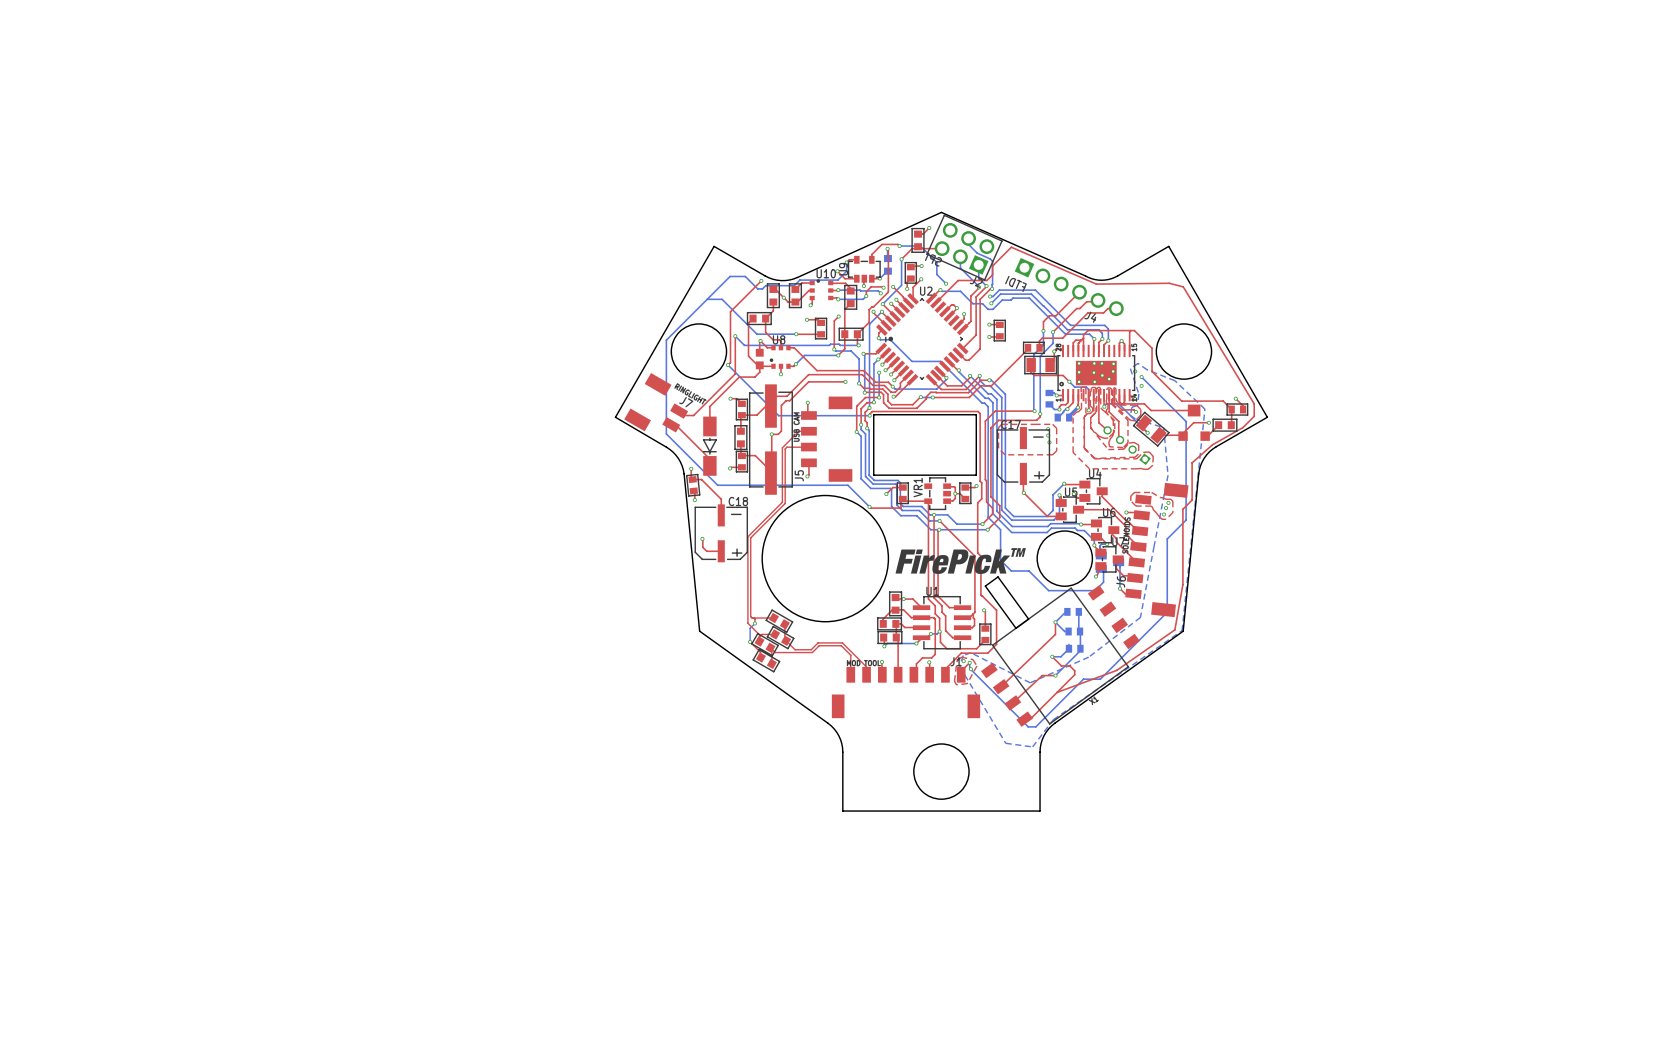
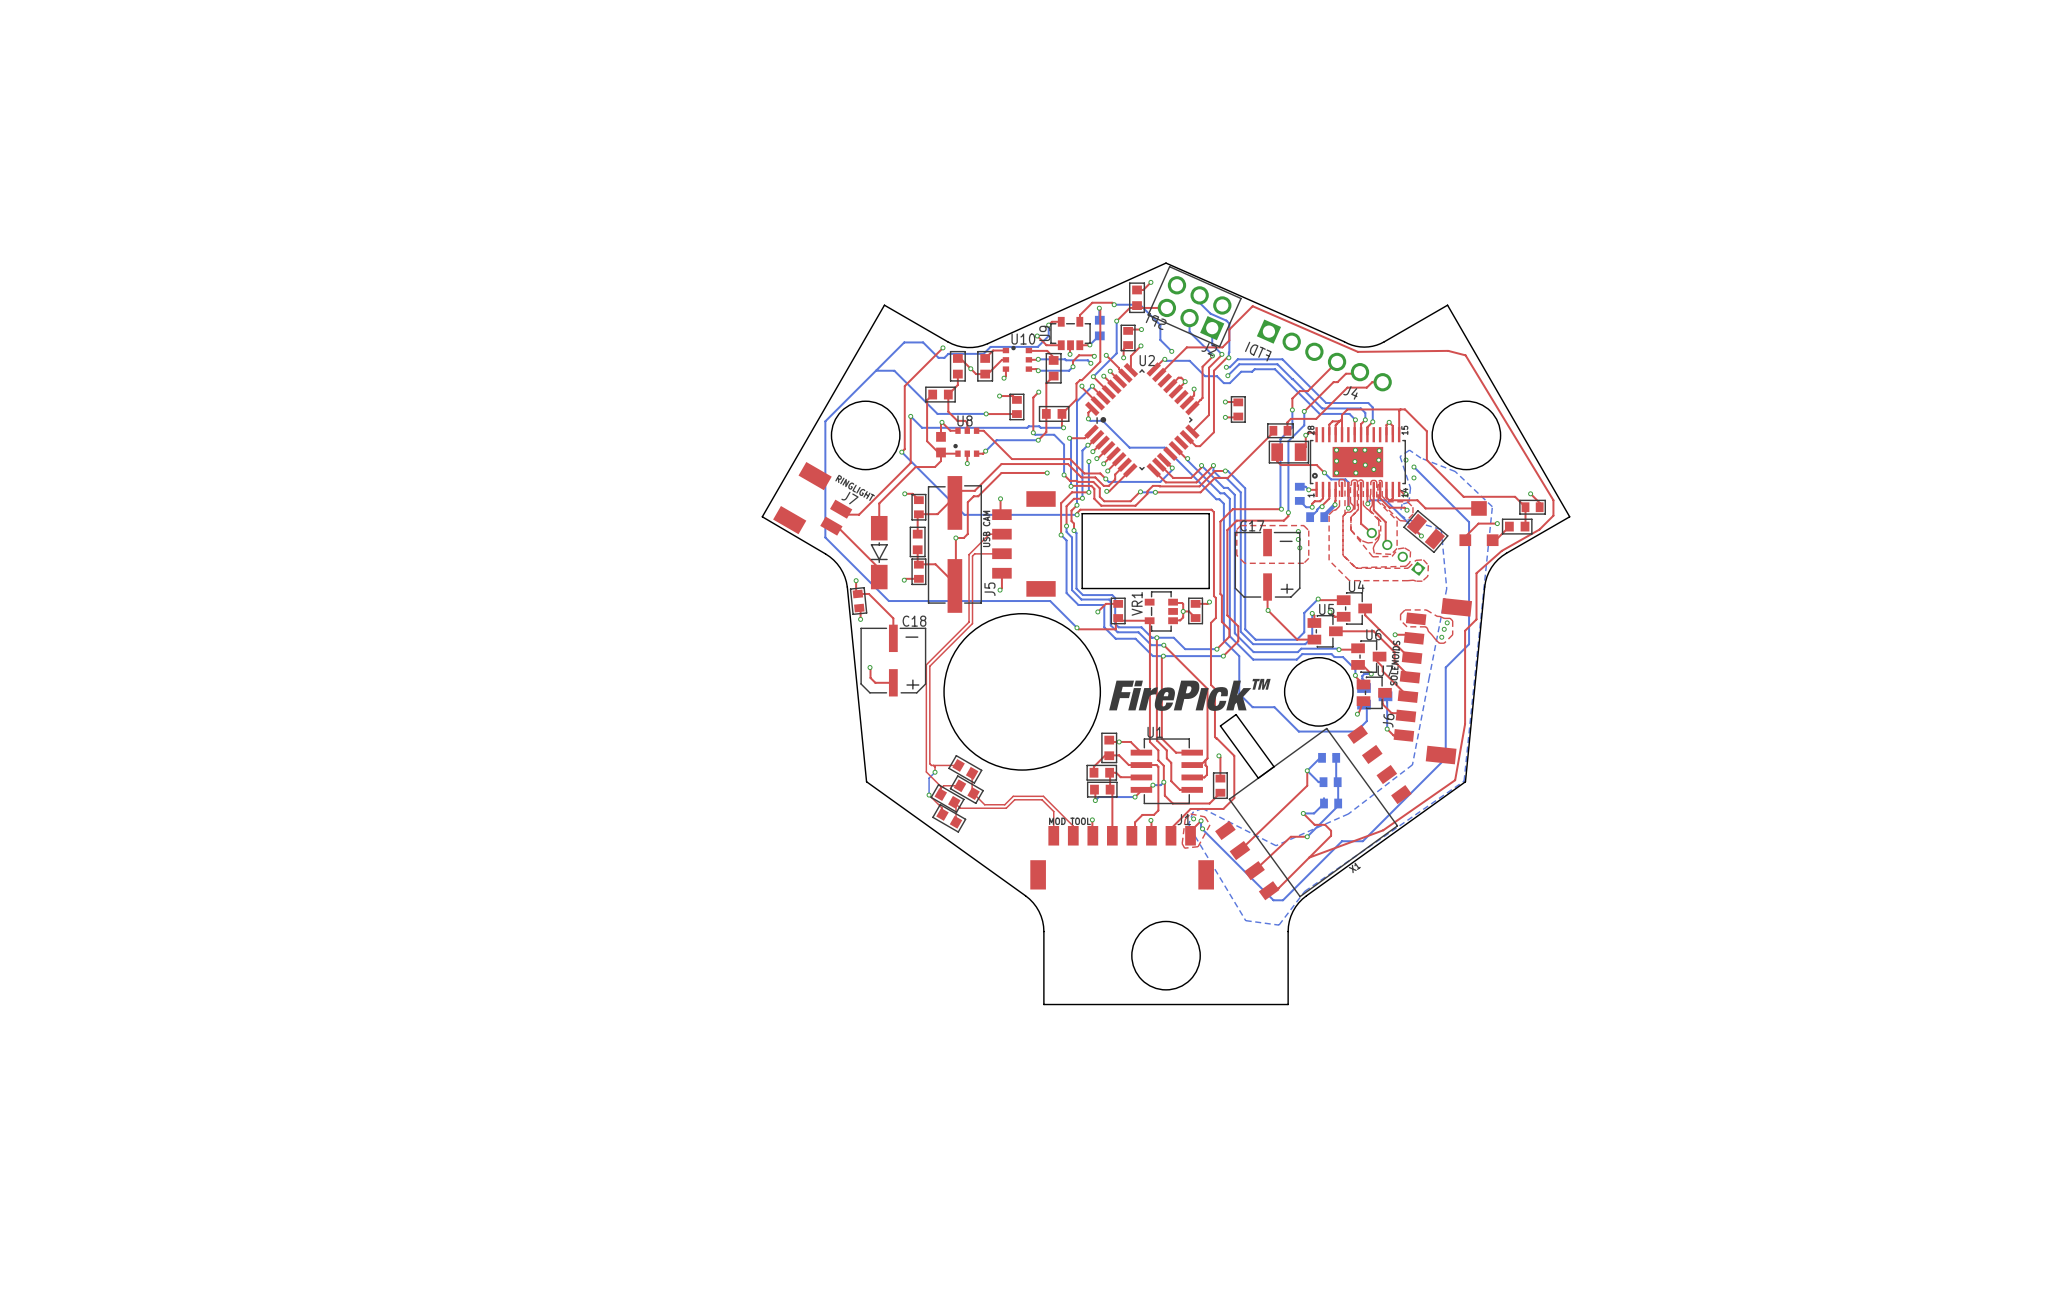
top track: (1158, 435) (1183, 436) -> none

